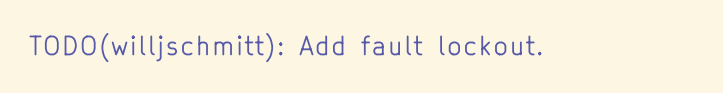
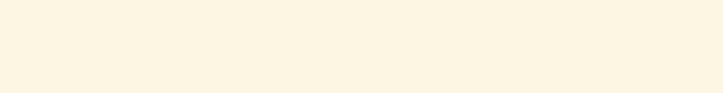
text: TODO(willjschmitt): Add fault lockout. (285, 47) -> none

